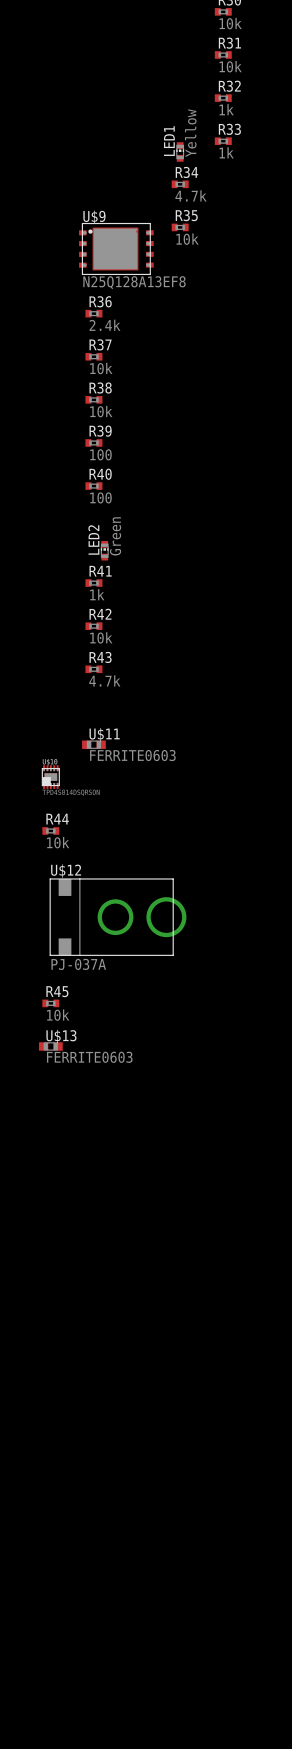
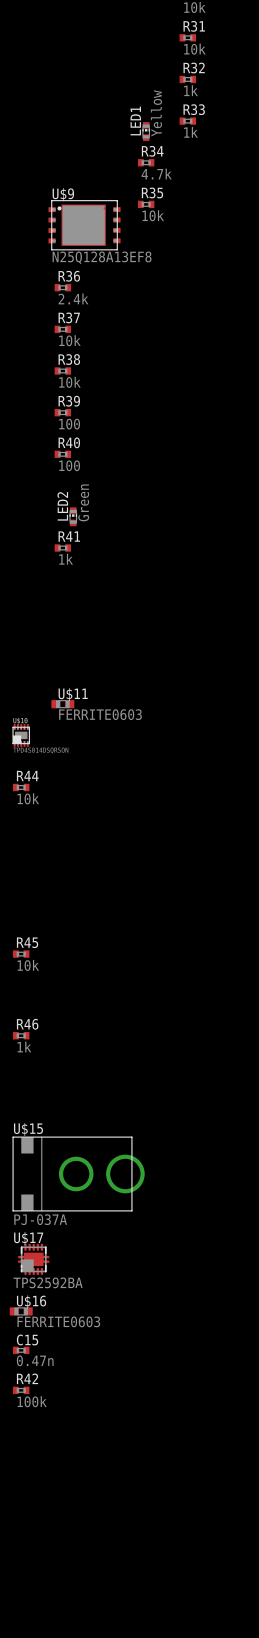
R42 position: (93, 626) -> (21, 1390)
R42 value: 10k (101, 637) -> 100k (32, 1401)
R43: 4.7k (93, 669) -> none
U$12: PJ-037A (118, 917) -> none
U$13: FERRITE0603 (50, 1046) -> none
R46: none -> 1k (21, 1035)
U$15: none -> PJ-037A (78, 1174)
U$17: none -> TPS2592BA (33, 1259)
U$16: none -> FERRITE0603 (21, 1311)
C15: none -> 0.47n (21, 1350)

